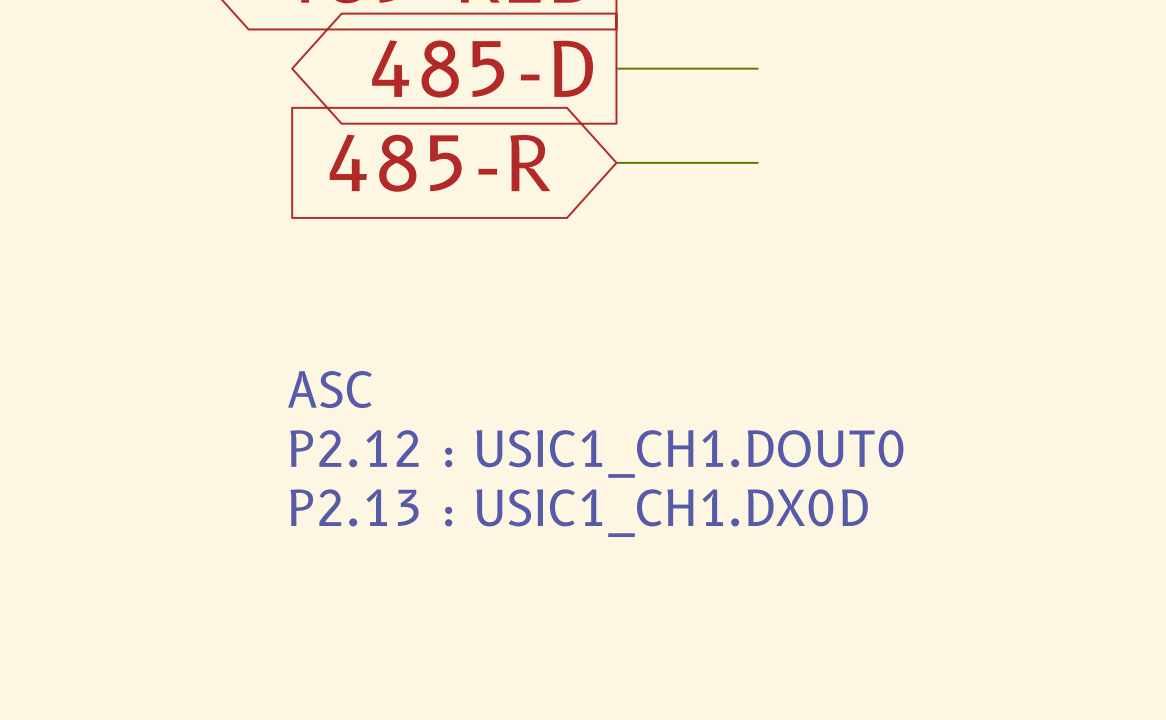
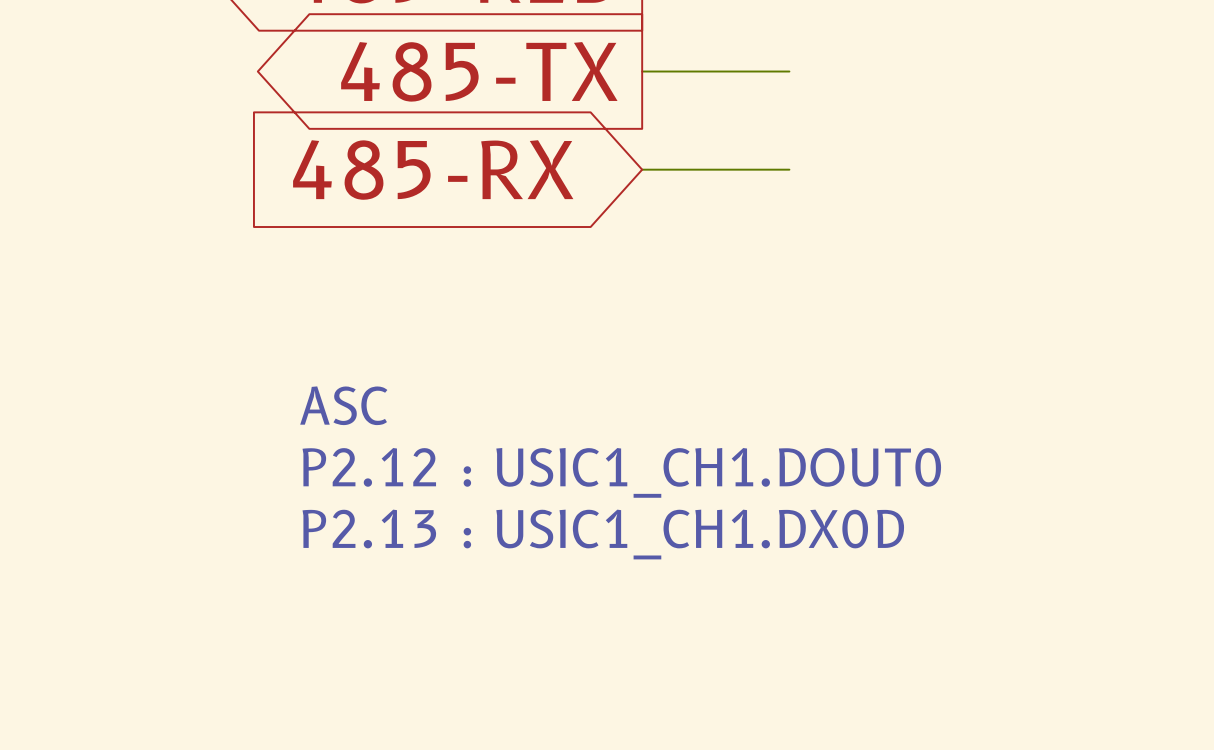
global label: 485-D (482, 68) -> 485-TX (479, 71)
global label: 485-R (440, 163) -> 485-RX (433, 170)

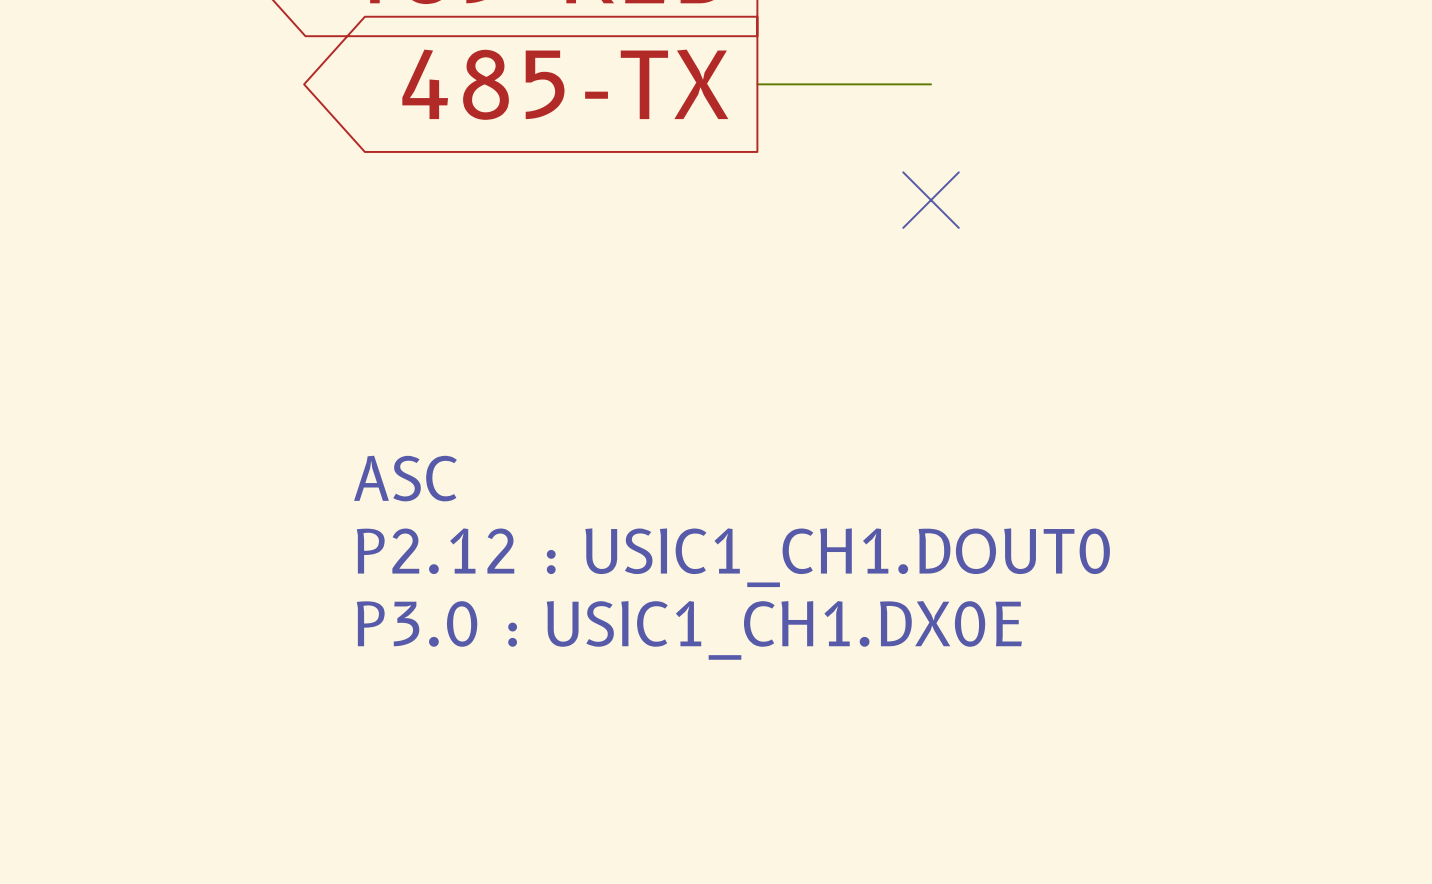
wire: (642, 169) (789, 169) -> none
no-connect mark: none -> (931, 200)
global label: 485-RX (433, 170) -> none
text: P2.13 : USIC1_CH1.DX0D (603, 534) -> P3.0 : USIC1_CH1.DX0E (689, 630)

